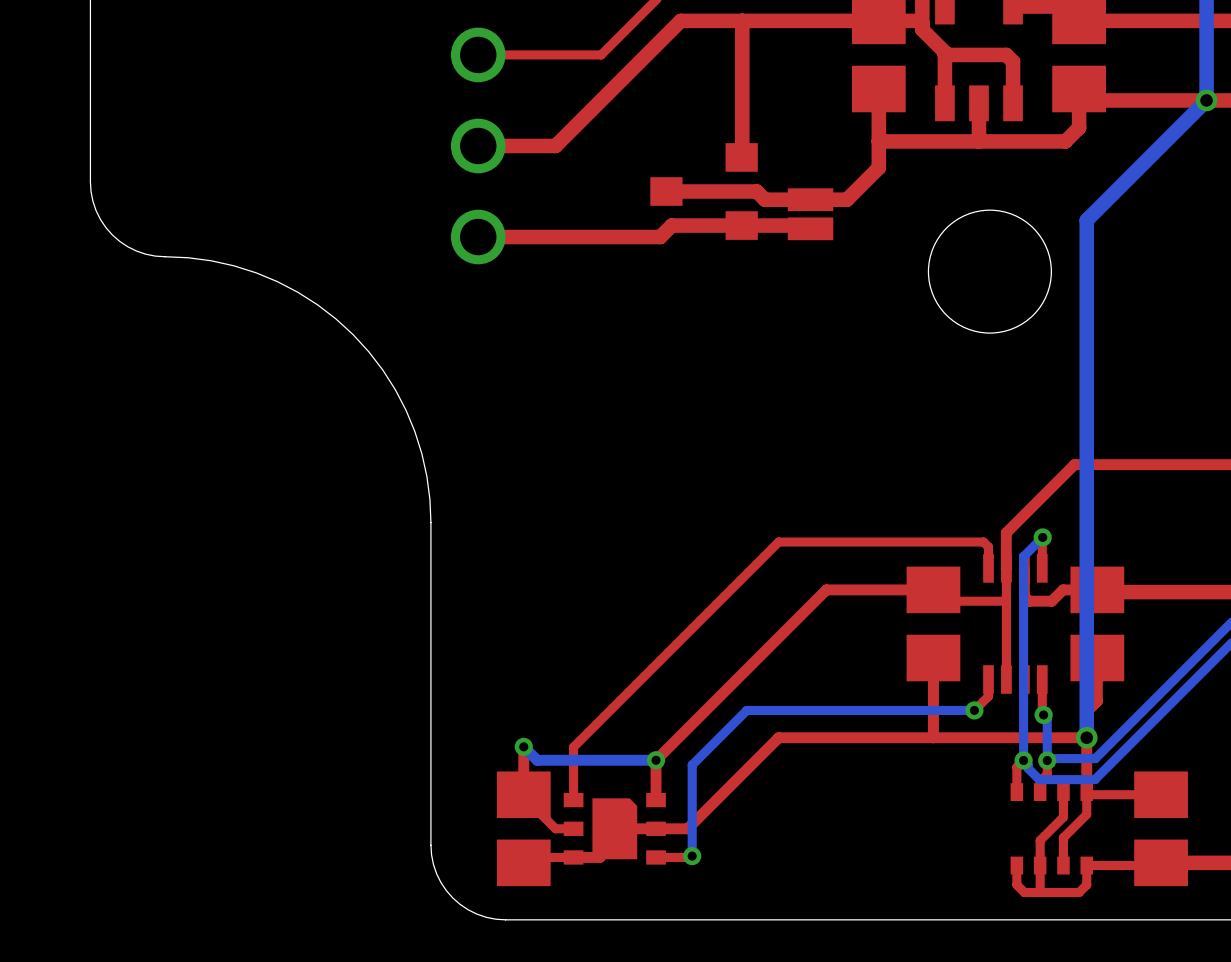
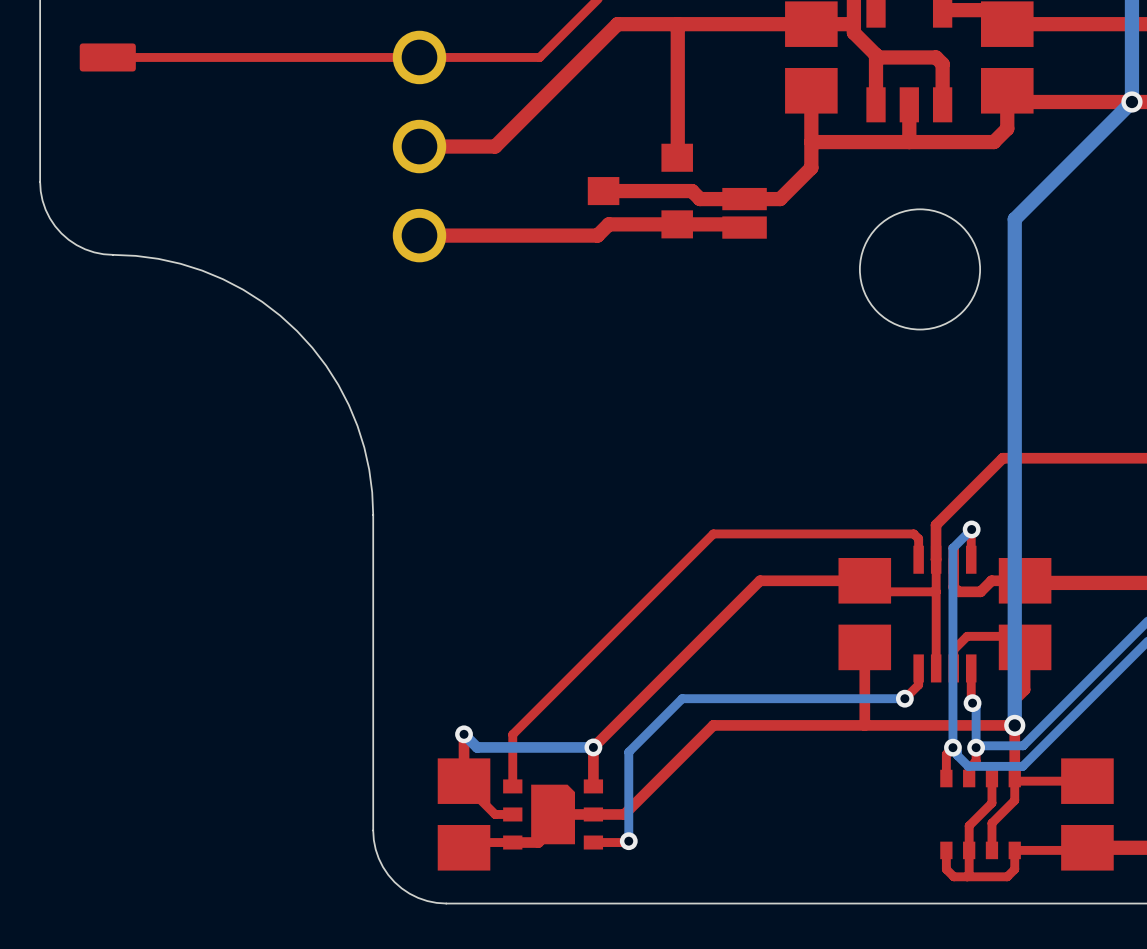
part: none -> (107, 57)
top track: none -> (419, 57) (107, 57)
top track: none -> (1025, 647) (1014, 636) (967, 636) (953, 649) (953, 668)

